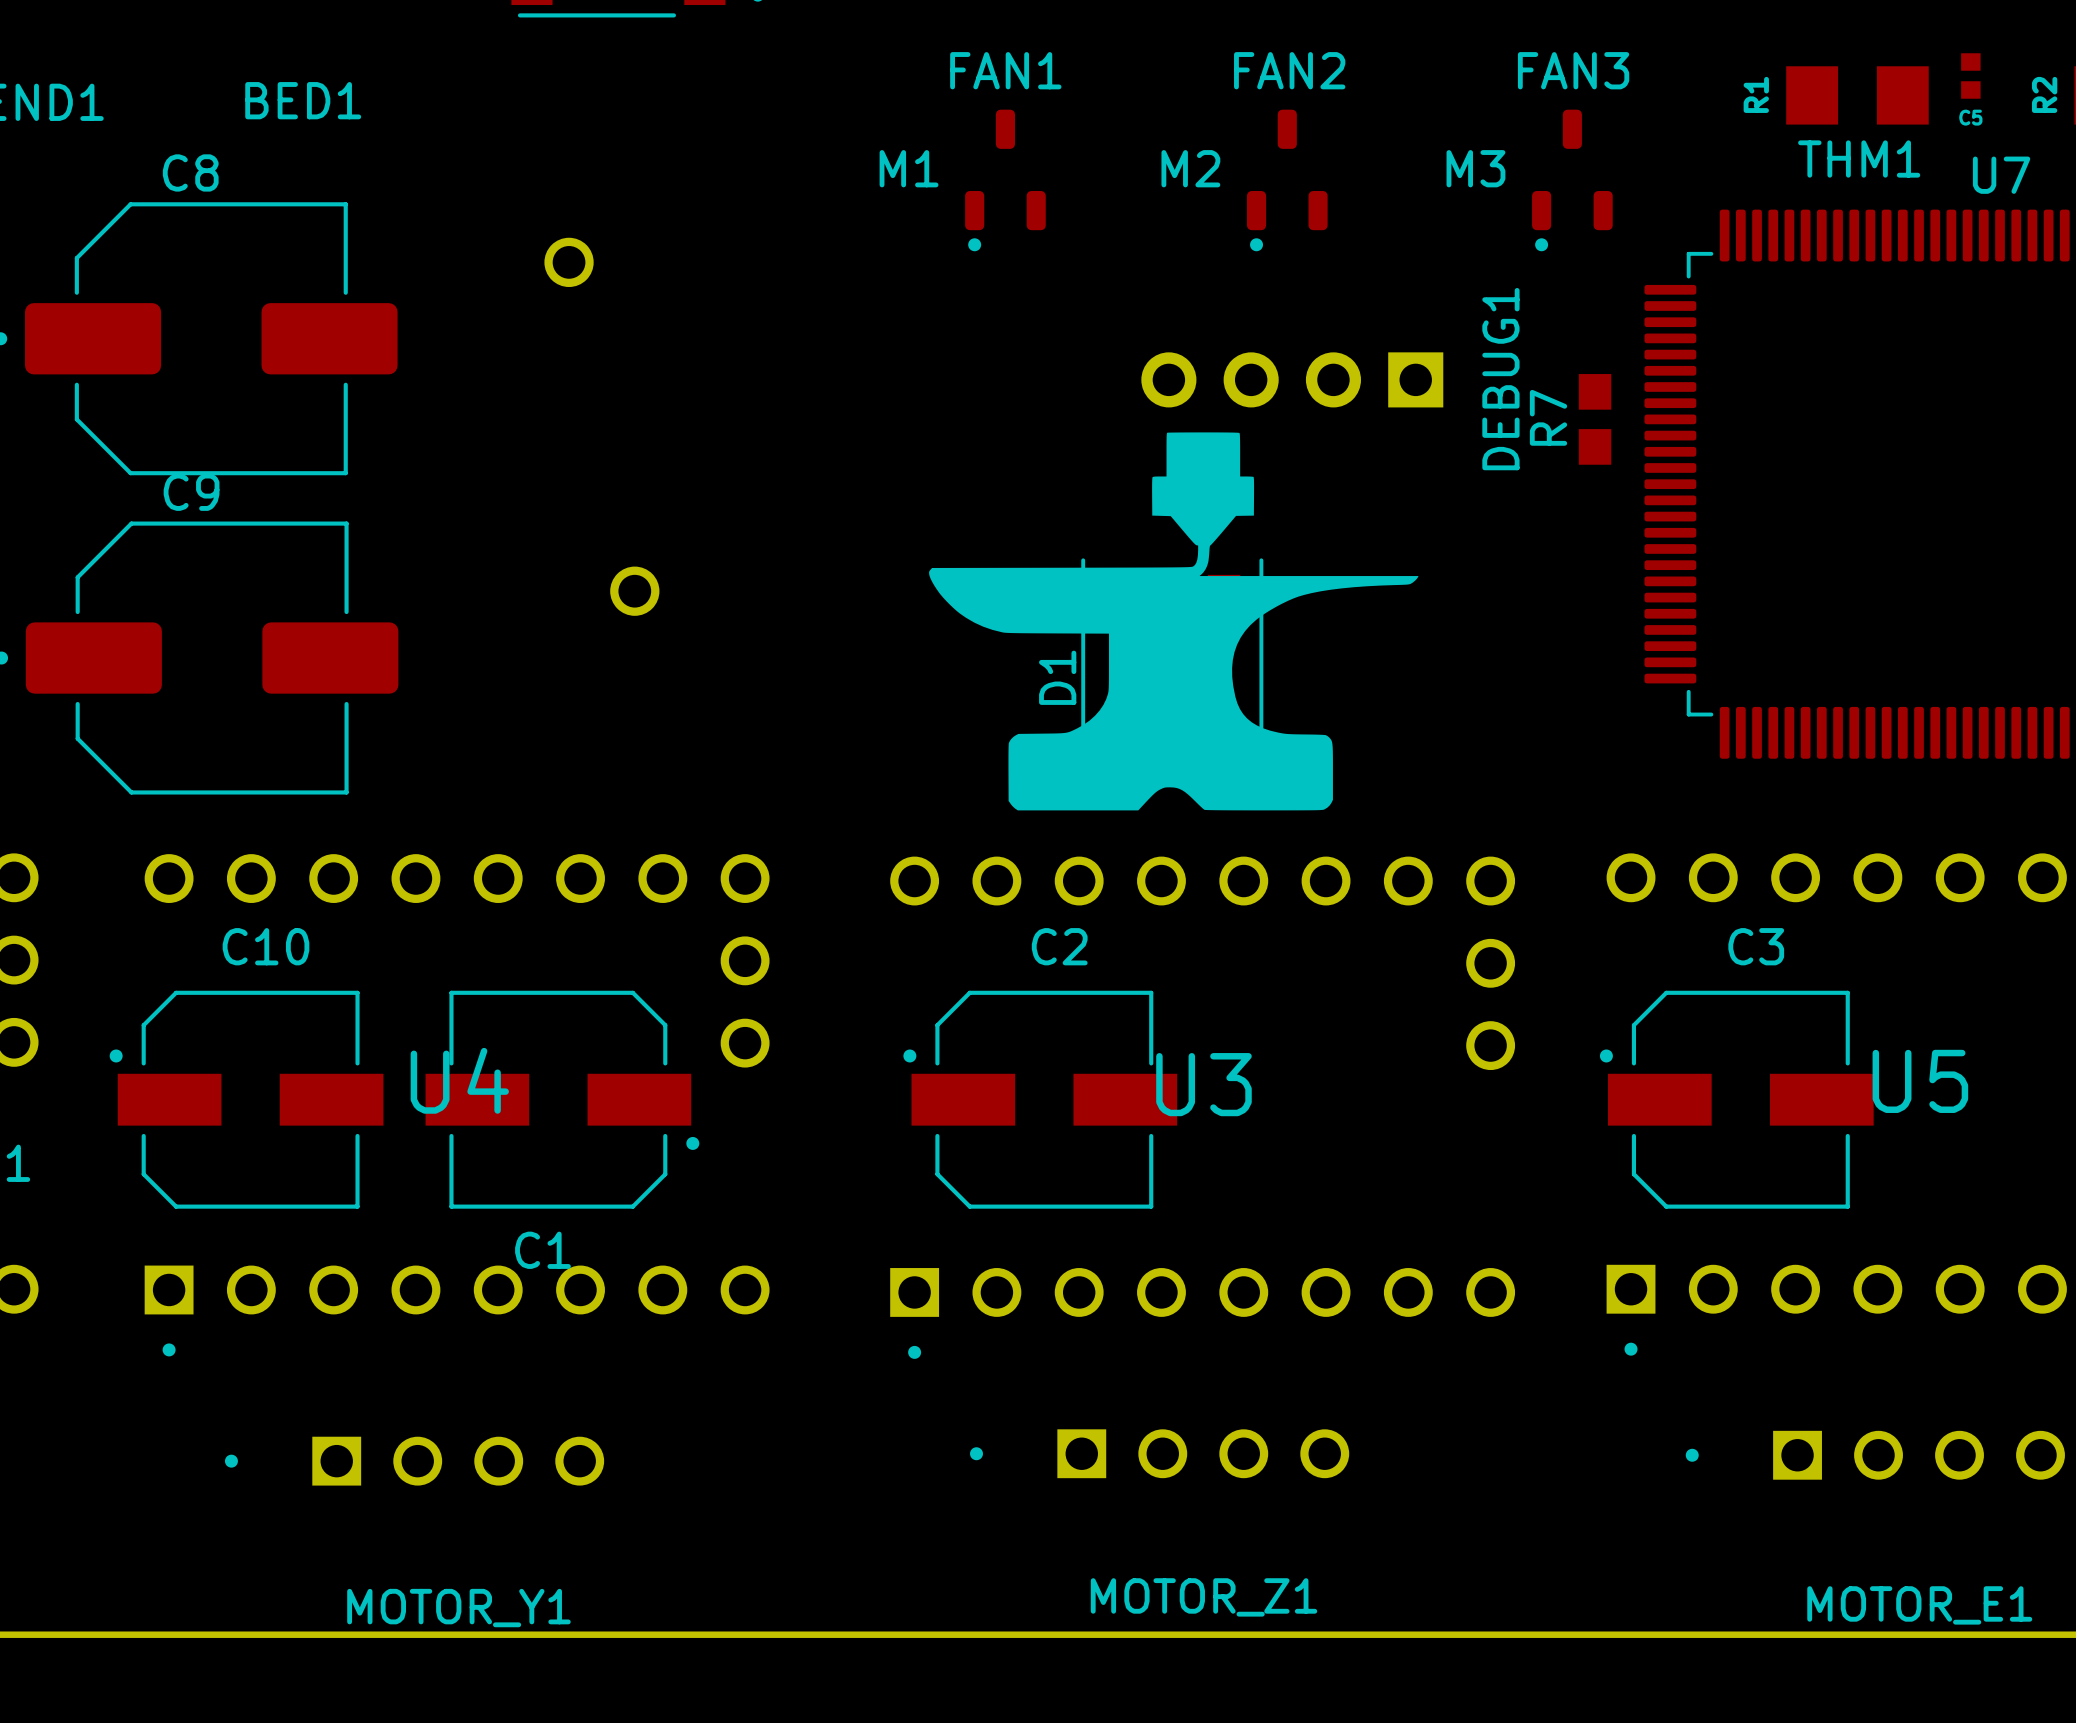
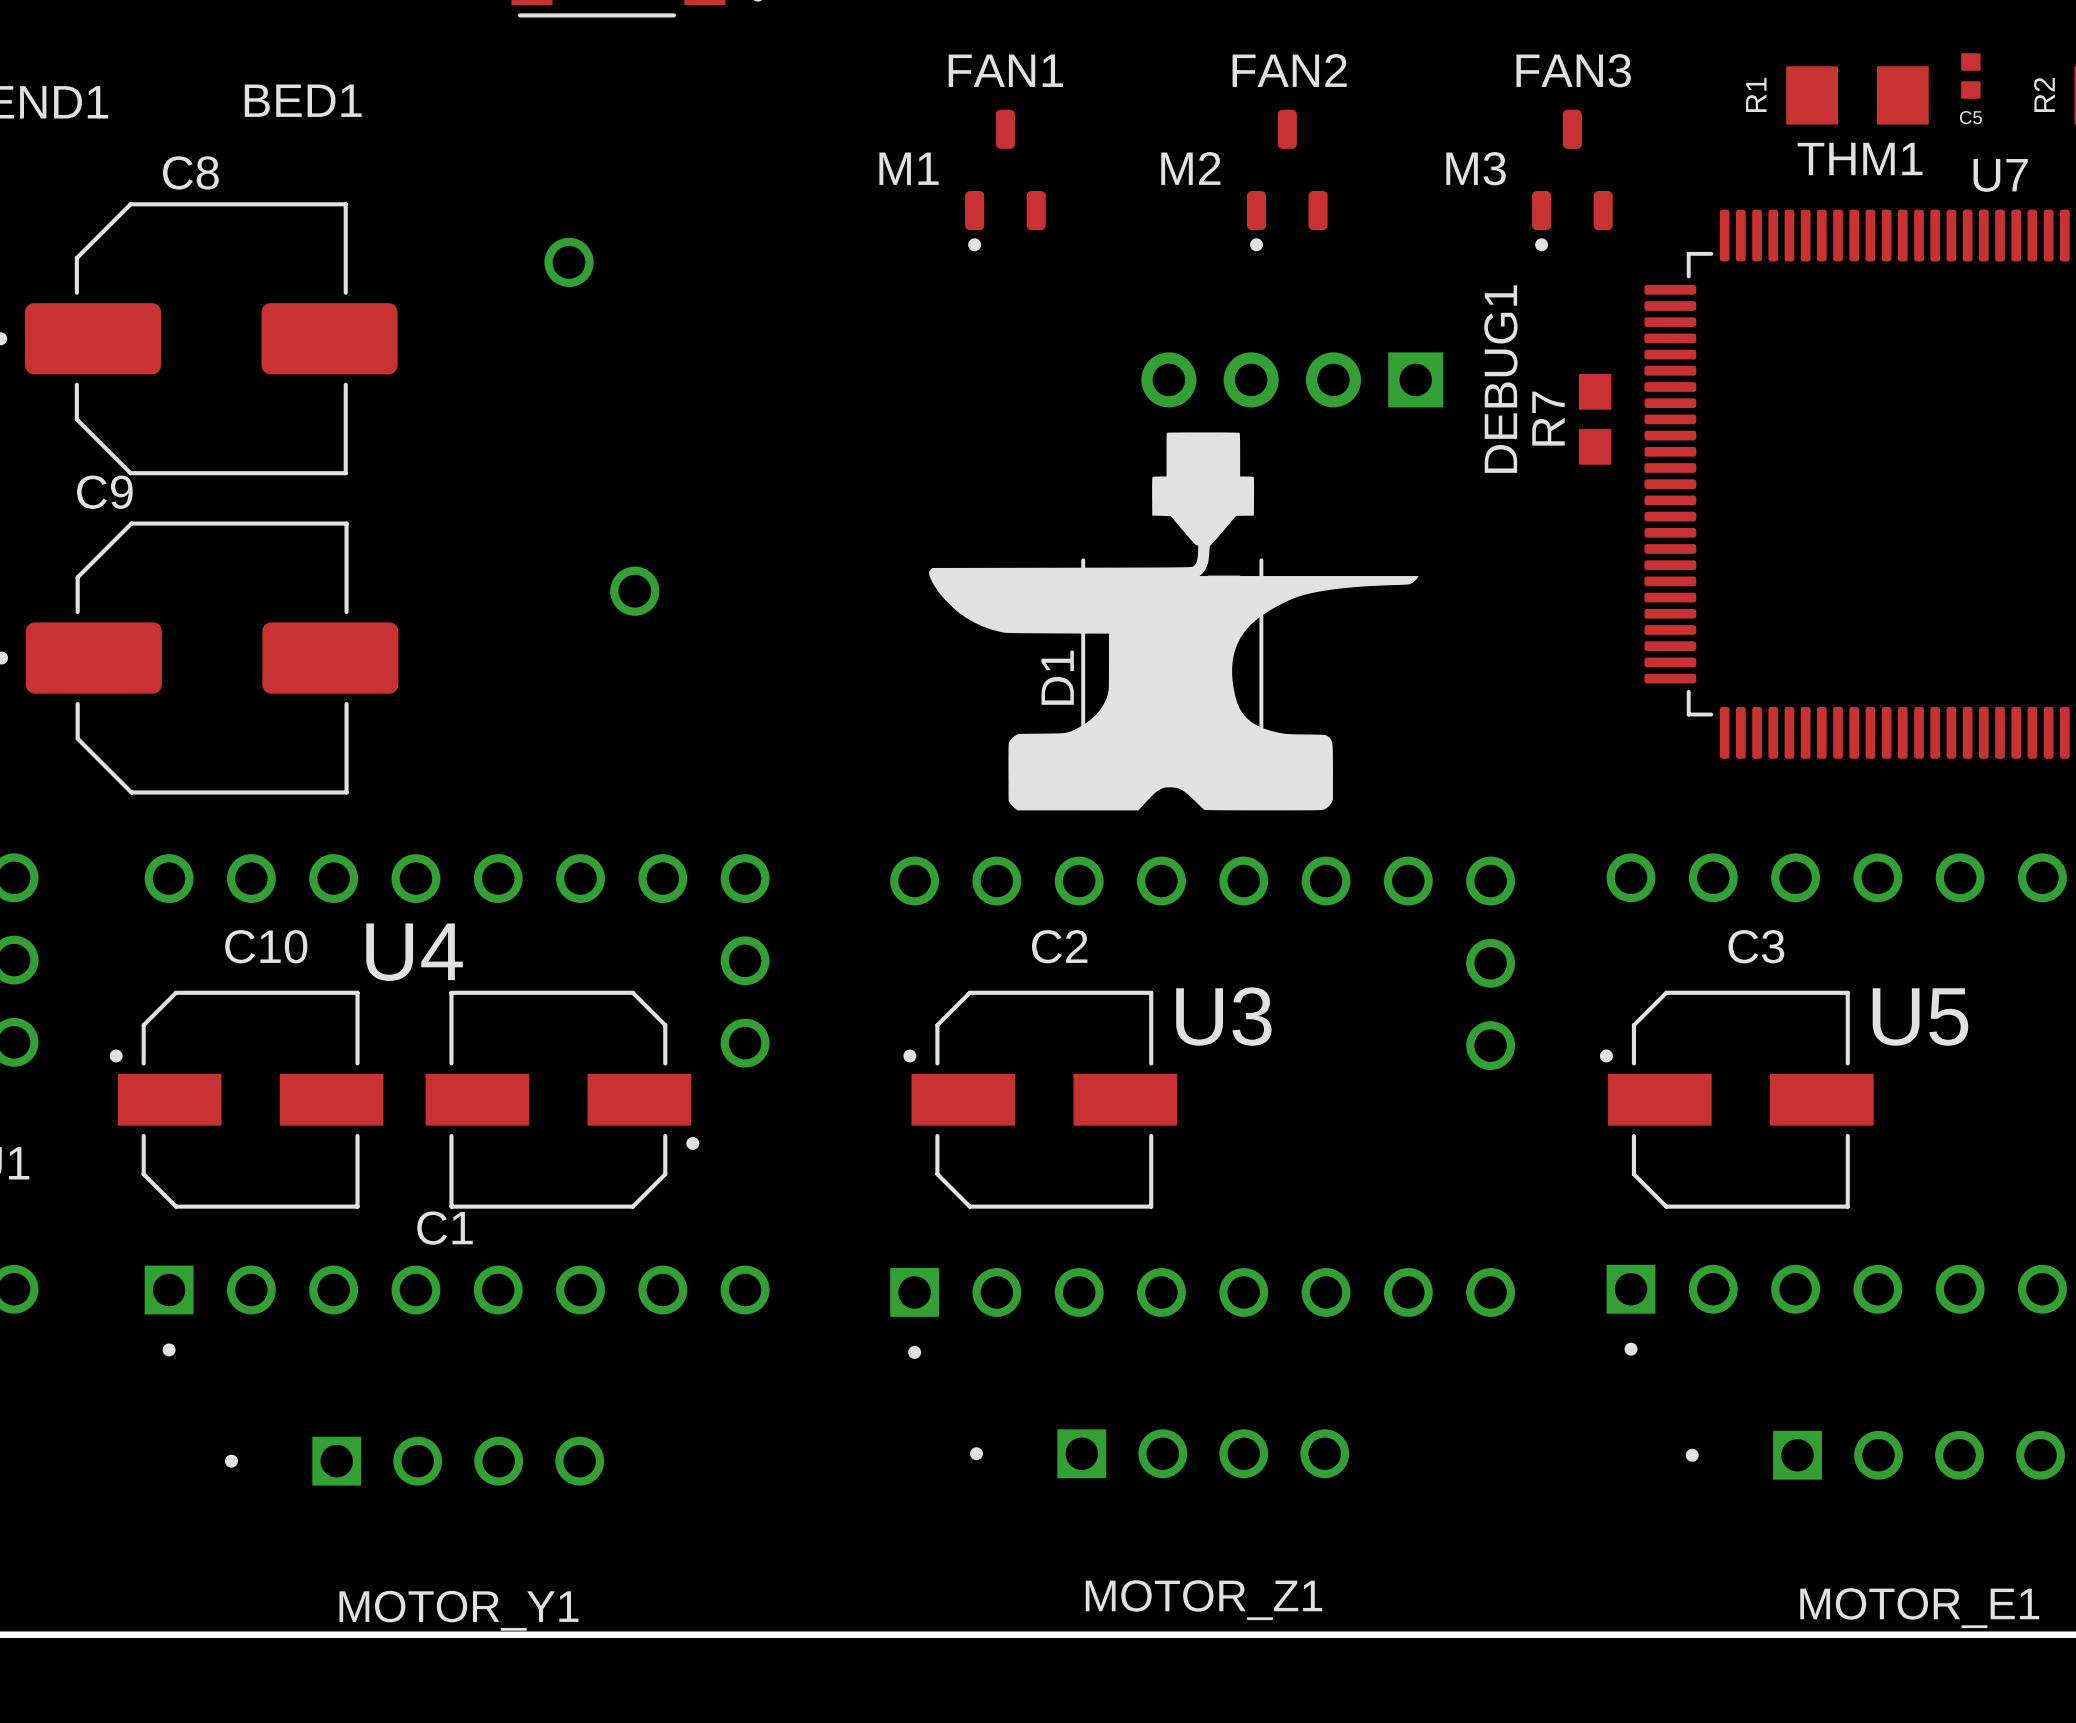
C9 name position: C9 (191, 492) -> C9 (104, 492)
U4 name position: U4 (459, 1080) -> U4 (414, 952)
U5 name position: U5 (1920, 1081) -> U5 (1920, 1017)
U3 name position: U3 (1203, 1084) -> U3 (1223, 1016)
C1 name position: C1 (542, 1250) -> C1 (445, 1228)

